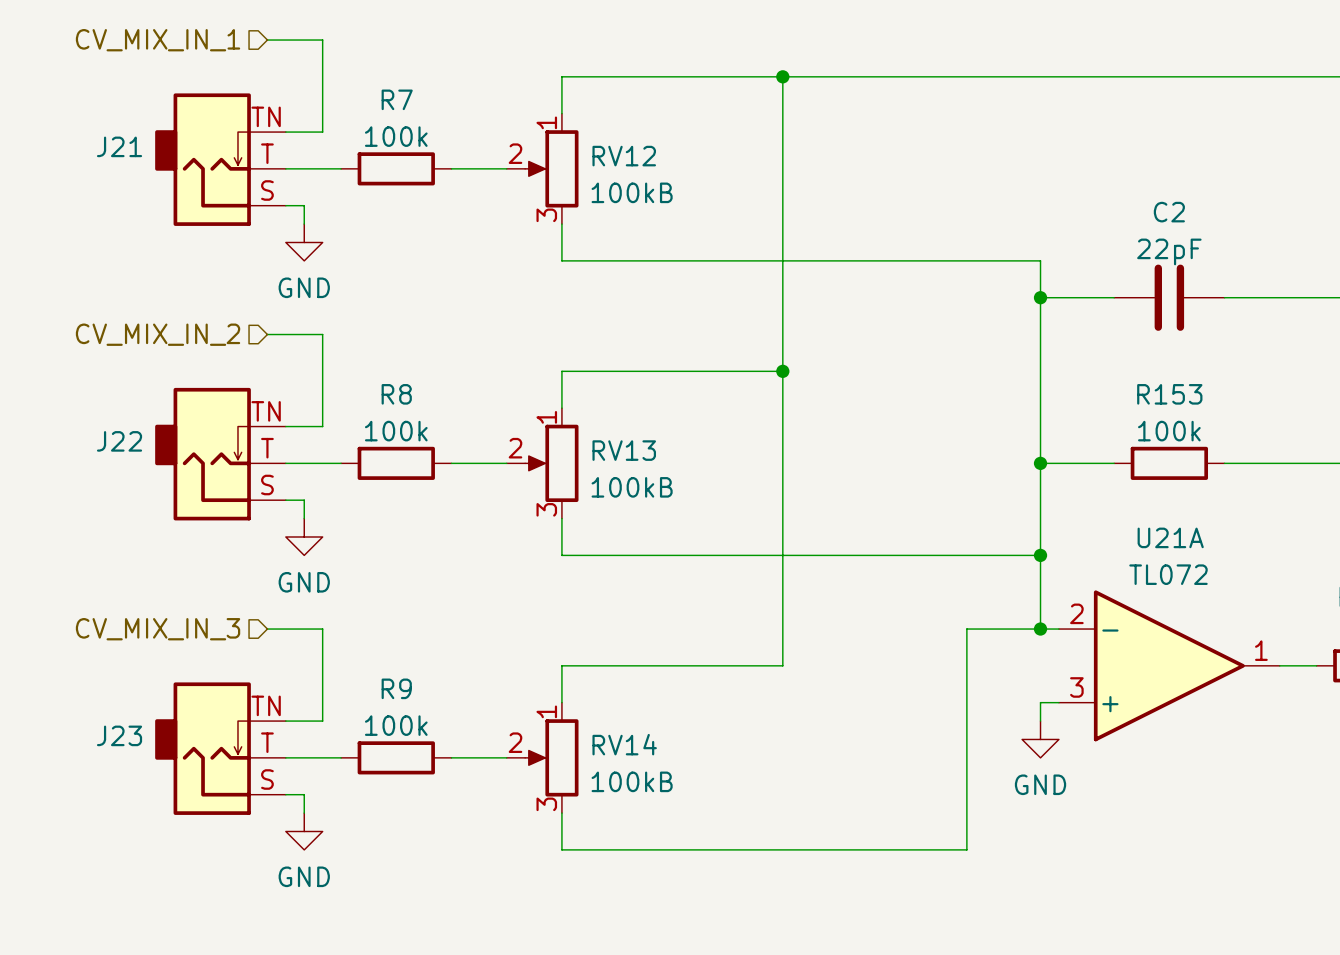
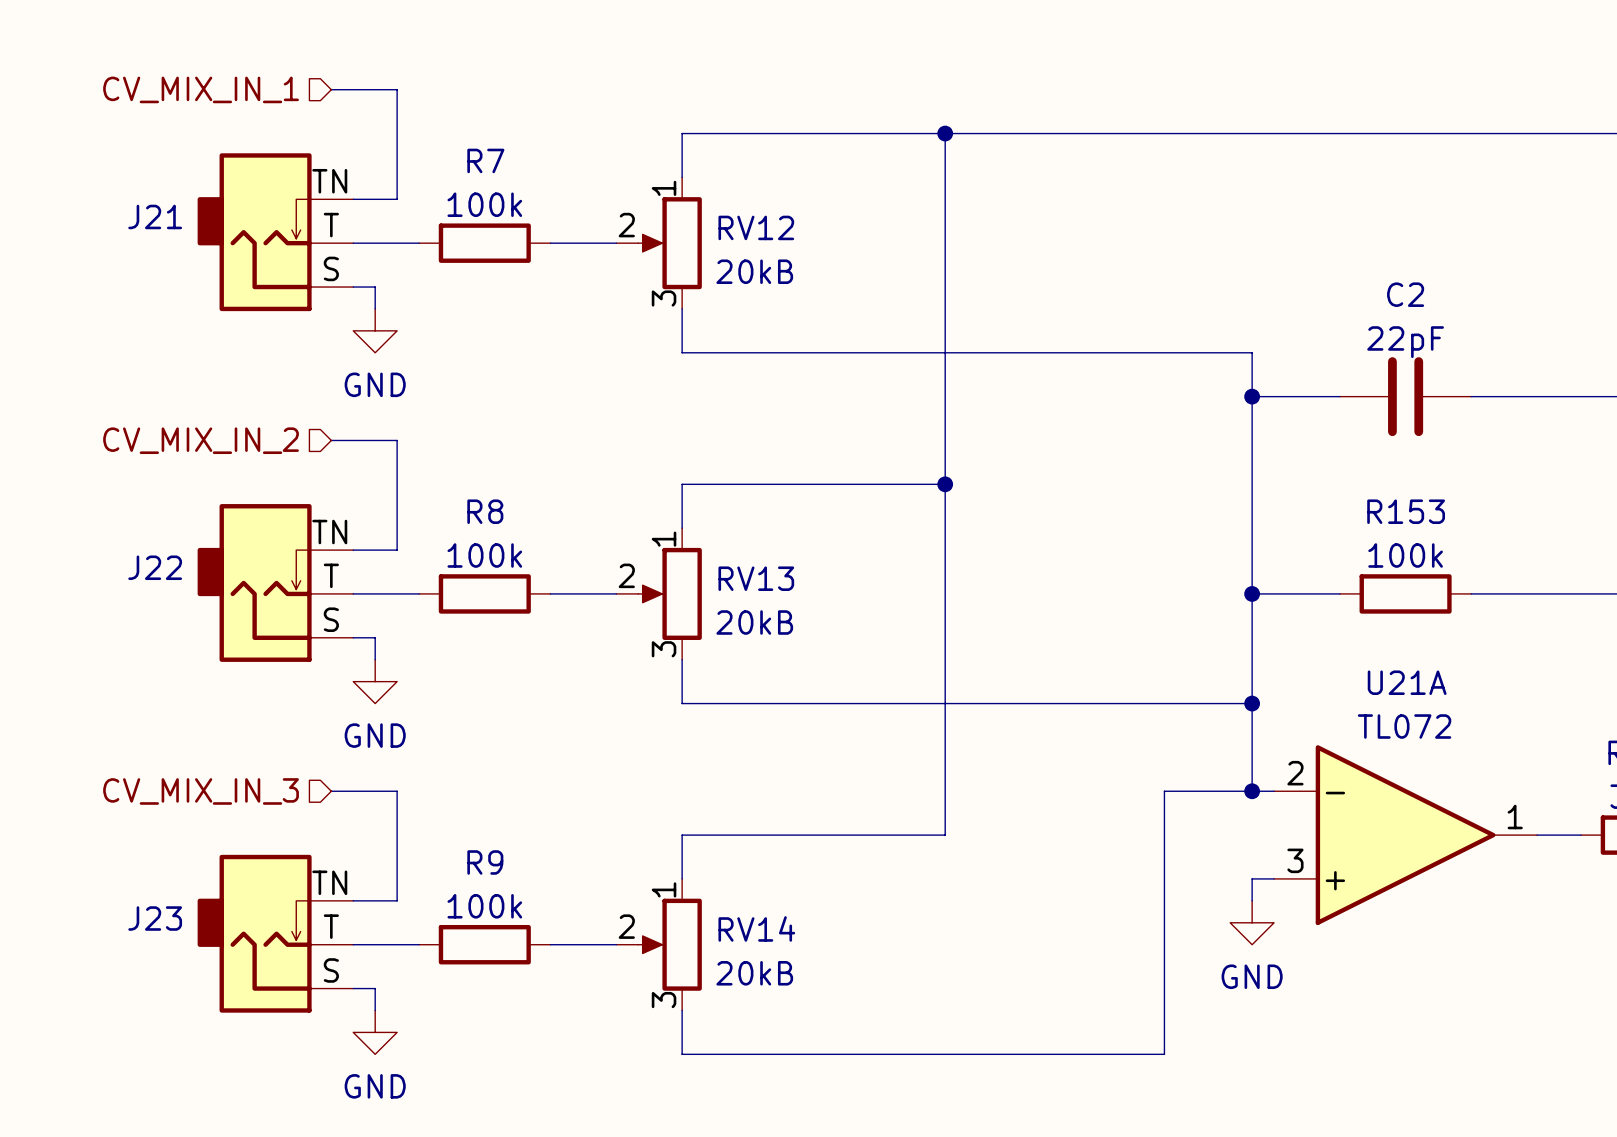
RV12 value: 100kB (632, 192) -> 20kB (754, 271)
RV13 value: 100kB (632, 487) -> 20kB (754, 622)
RV14 value: 100kB (632, 781) -> 20kB (754, 973)

